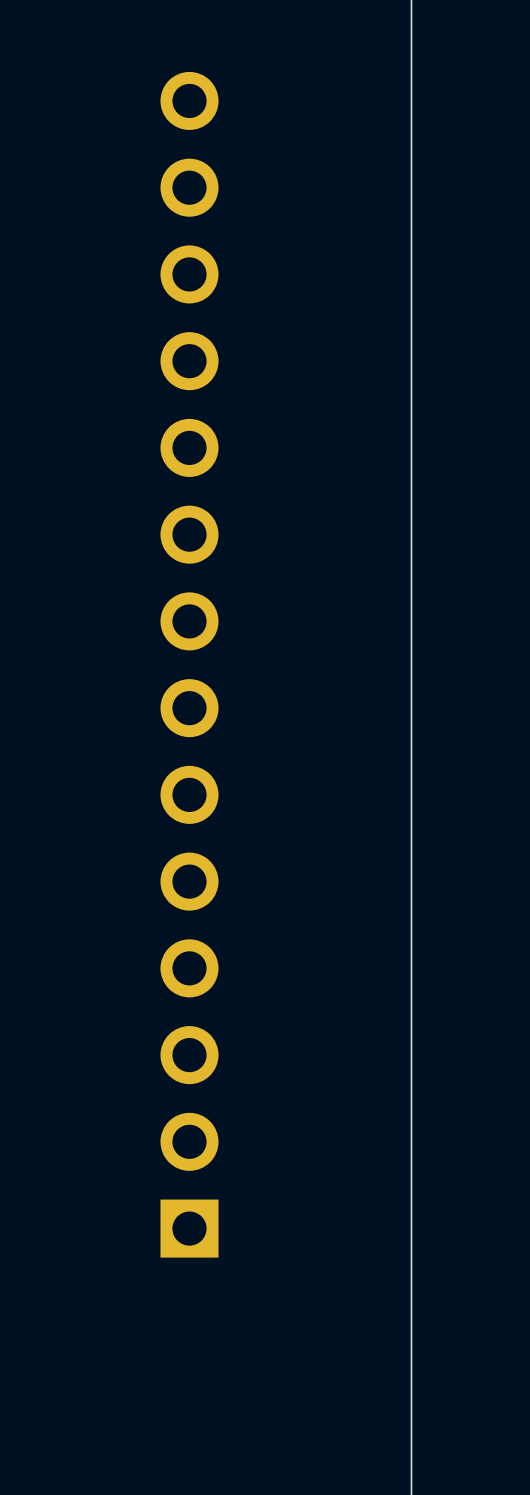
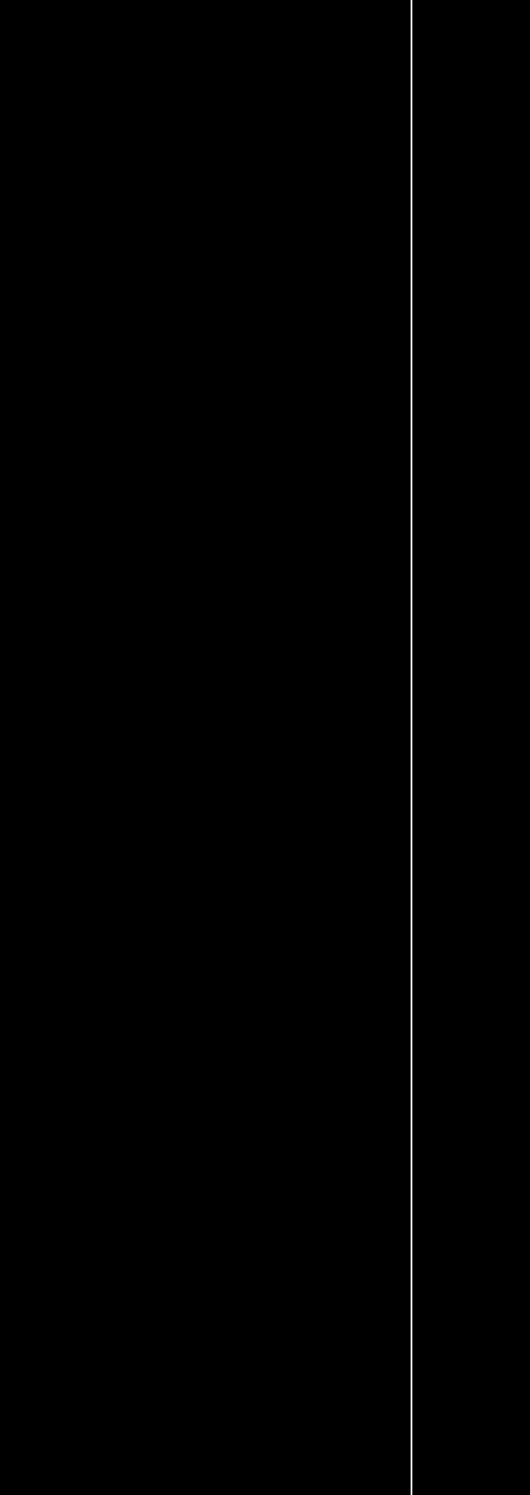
part: (189, 664) -> none

